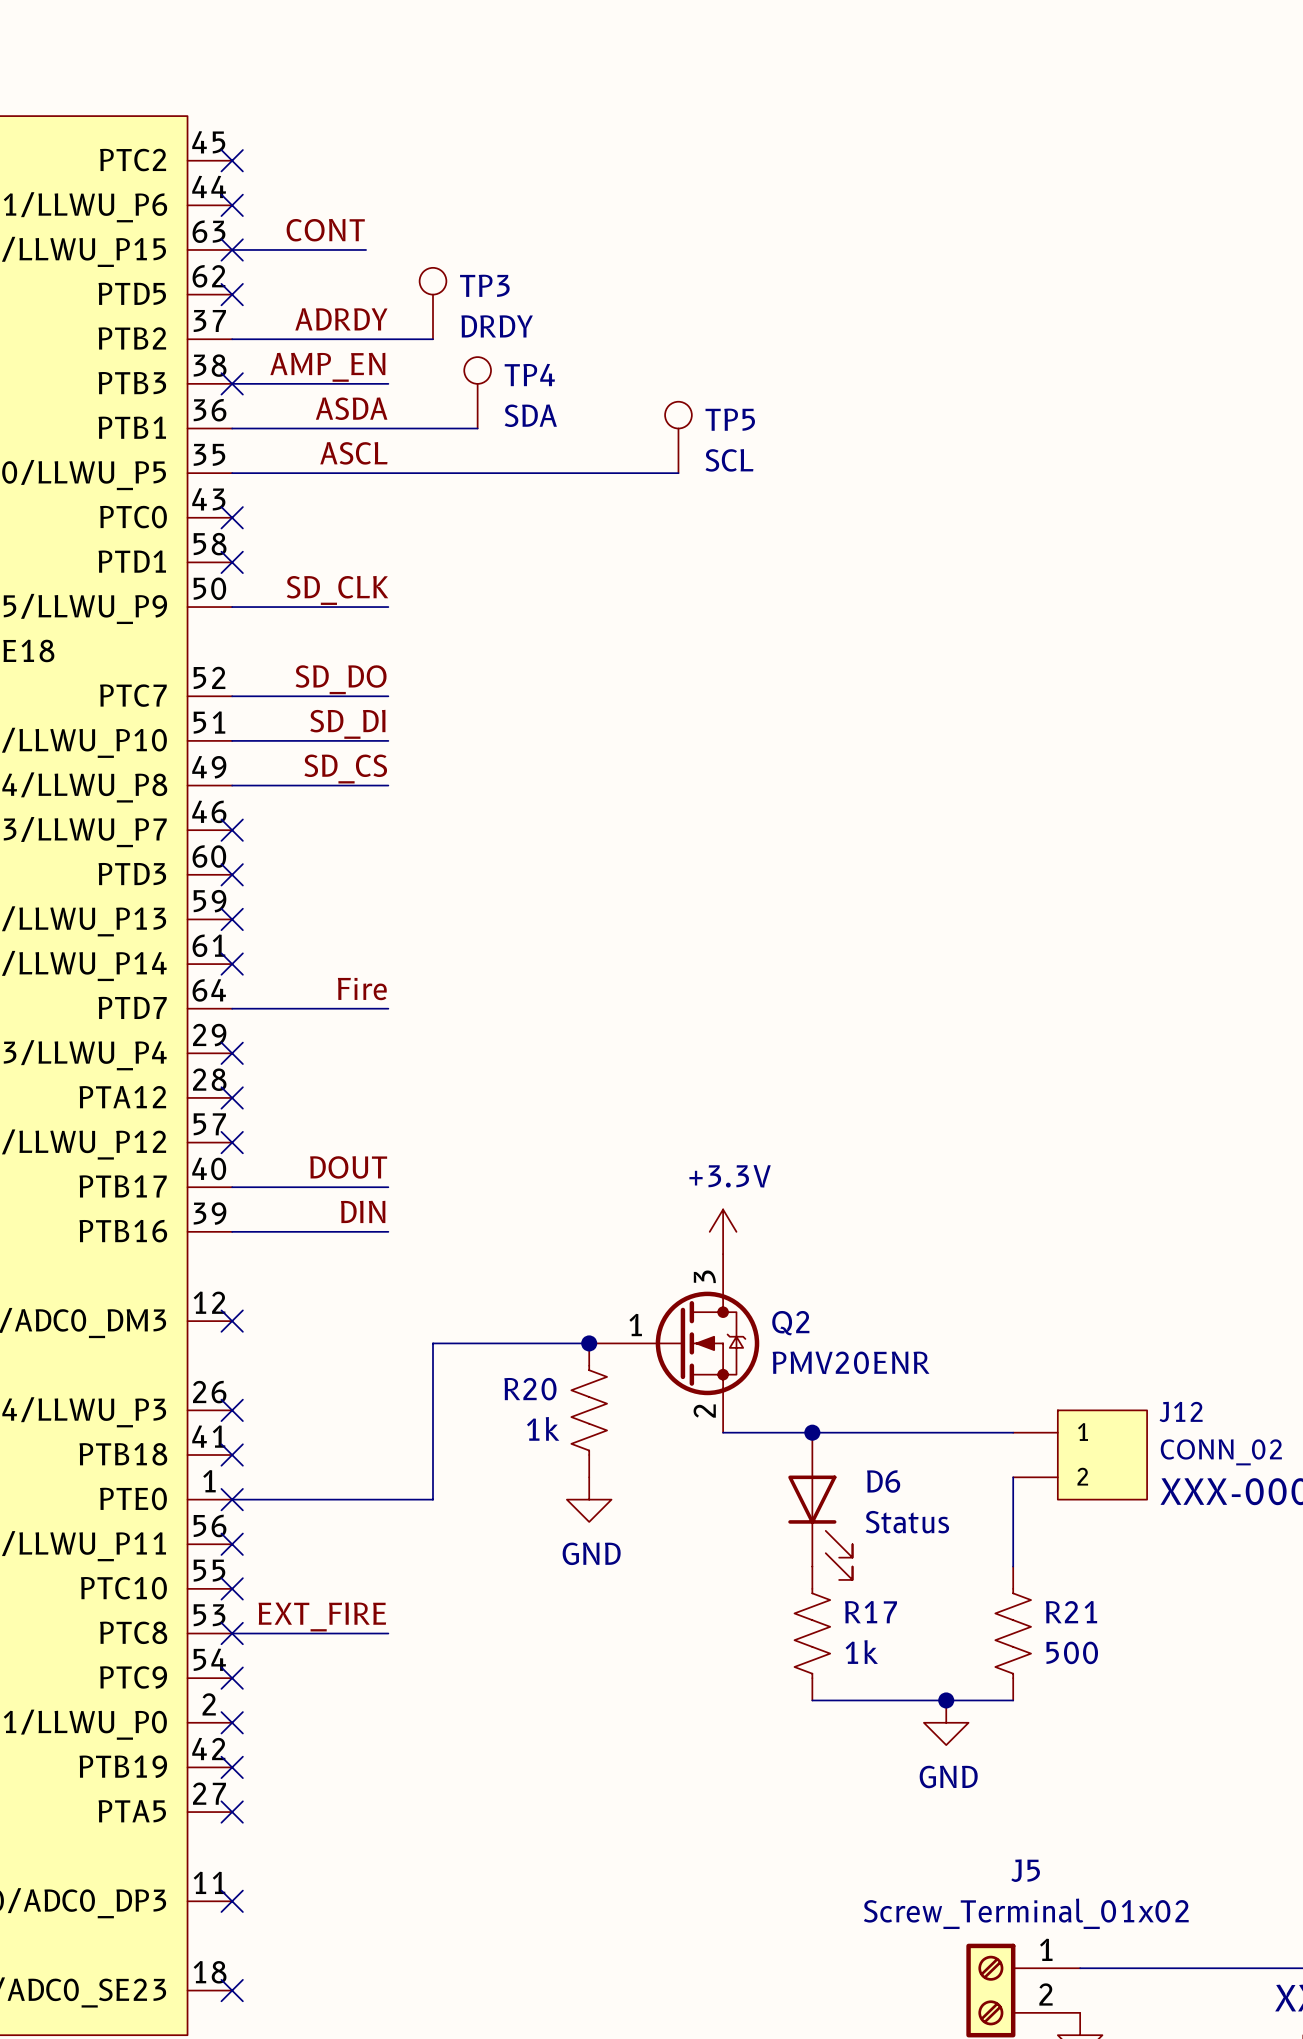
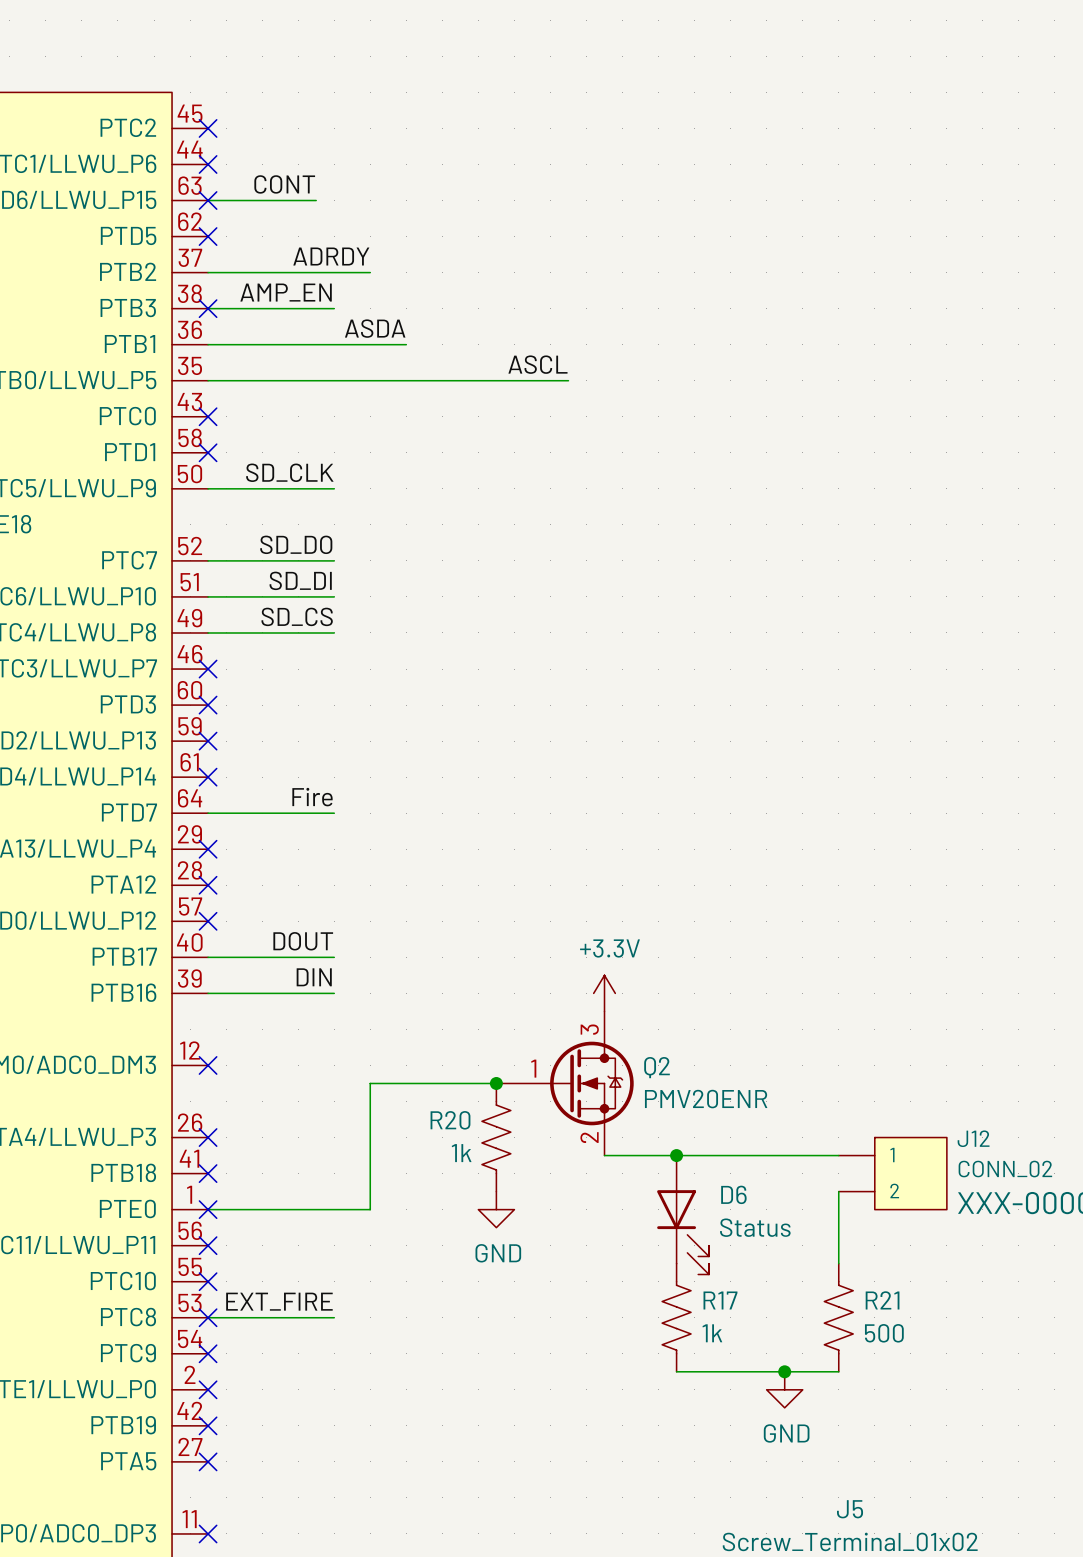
TP3: DRDY (433, 303) -> none
label position: ADRDY (341, 319) -> ADRDY (331, 256)
TP4: SDA (477, 392) -> none
label position: ASDA (351, 408) -> ASDA (375, 328)
TP5: SCL (678, 437) -> none
label position: ASCL (353, 453) -> ASCL (537, 364)

